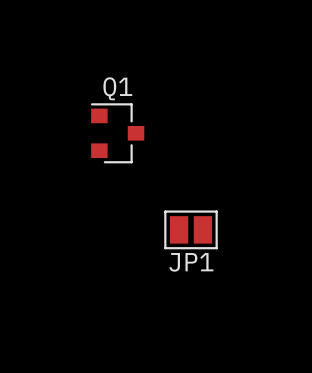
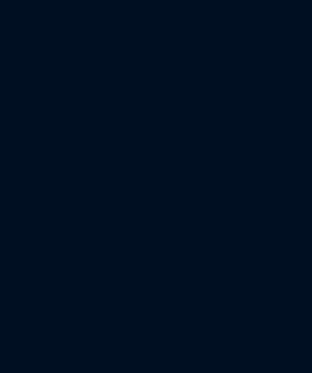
Q1: (117, 133) -> none
JP1: (190, 229) -> none

